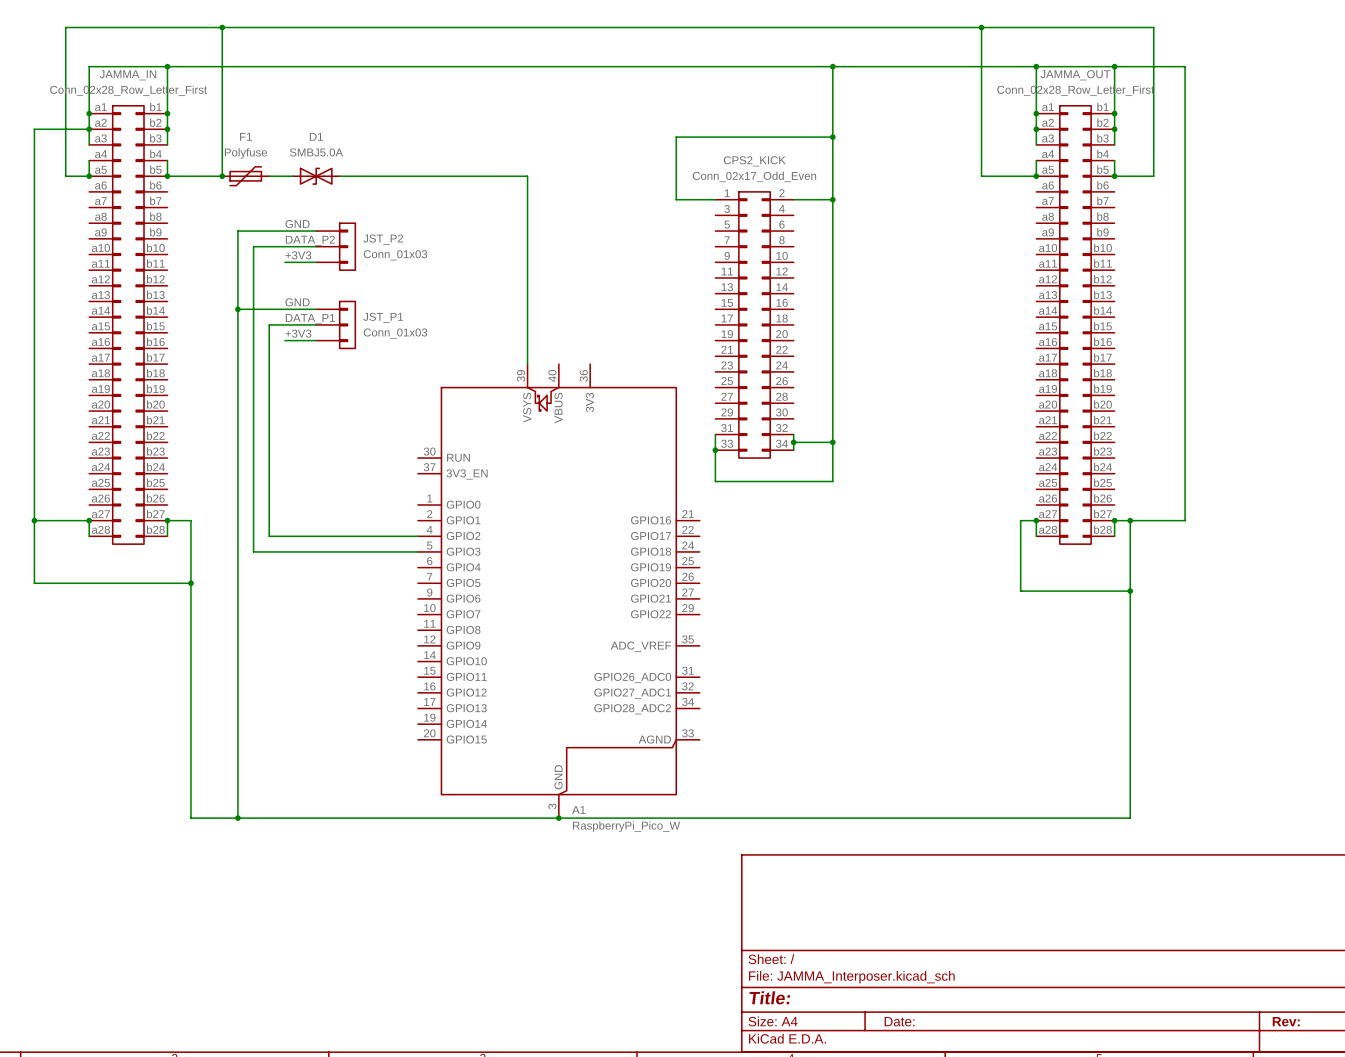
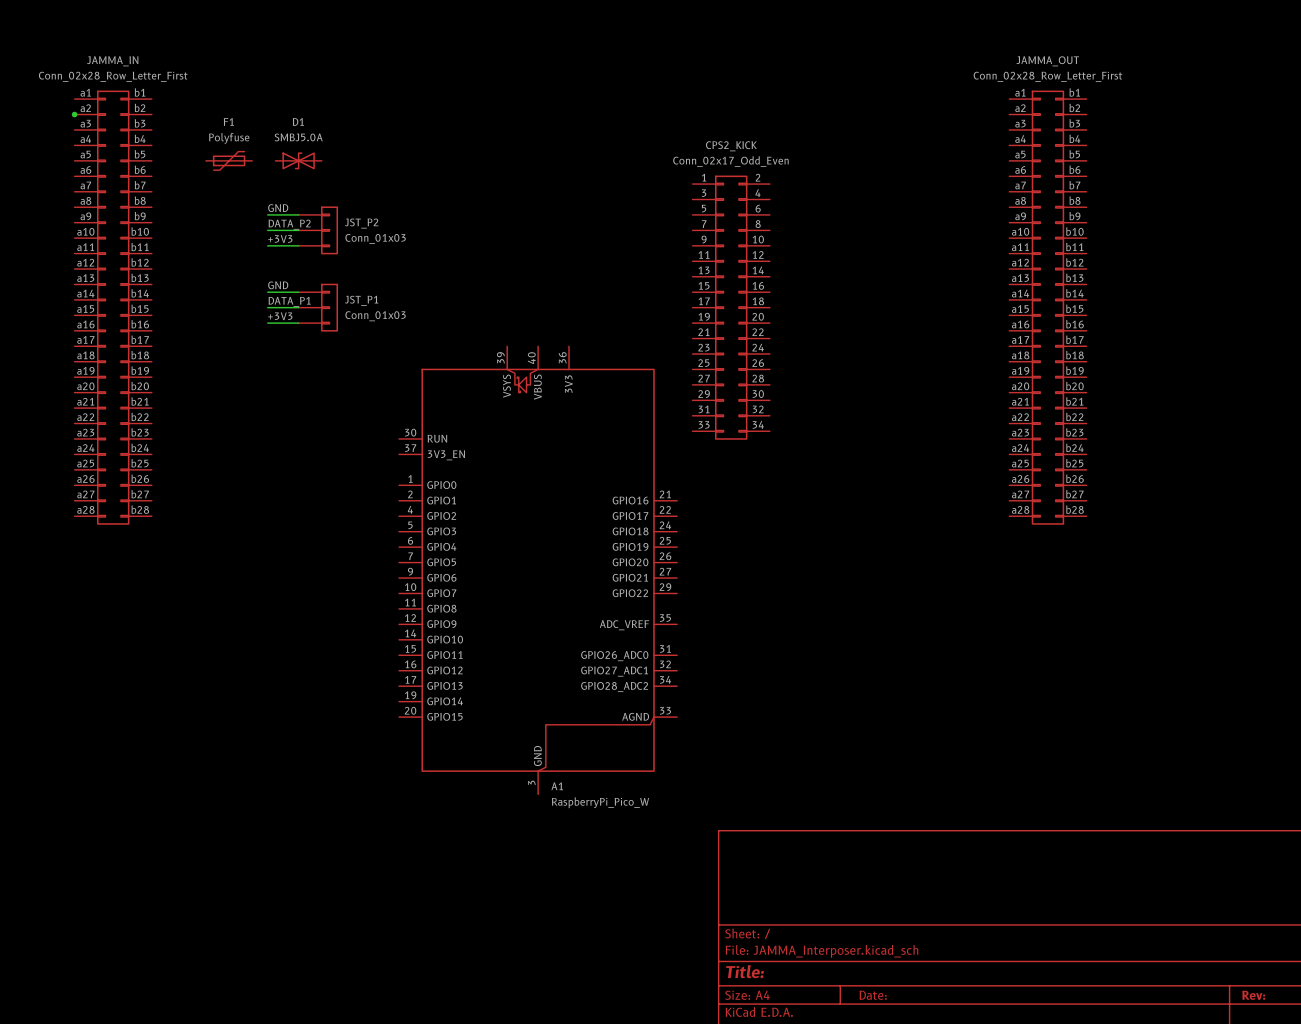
wire: (222, 27) (222, 176) (167, 176) (167, 160) -> none
junction: (222, 27) -> none
wire: (981, 27) (981, 176) (1036, 176) (1036, 160) -> none
junction: (981, 27) -> none
wire: (167, 66) (167, 144) -> none
junction: (167, 66) -> none
wire: (832, 66) (832, 481) (715, 481) (715, 434) -> none
junction: (832, 66) -> none
wire: (1036, 66) (1036, 144) -> none
junction: (1036, 66) -> none
wire: (1114, 66) (1114, 144) -> none
junction: (1114, 66) -> none
junction: (89, 113) -> none
junction: (167, 113) -> none
junction: (1036, 113) -> none
junction: (1114, 113) -> none
wire: (89, 129) (34, 129) (34, 583) (190, 583) -> none
junction: (167, 129) -> none
junction: (1036, 129) -> none
junction: (1114, 129) -> none
wire: (832, 137) (676, 137) (676, 199) (715, 199) -> none
junction: (832, 137) -> none
wire: (89, 144) (89, 66) (1185, 66) (1185, 520) (1114, 520) (1114, 536) -> none
wire: (89, 160) (89, 176) (65, 176) (65, 27) (1153, 27) (1153, 176) (1114, 176) (1114, 160) -> none
junction: (89, 176) -> none
junction: (167, 176) -> none
junction: (222, 176) -> none
wire: (269, 176) (292, 176) -> none
wire: (339, 176) (527, 176) (527, 364) -> none
junction: (1036, 176) -> none
junction: (1114, 176) -> none
wire: (793, 199) (832, 199) -> none
junction: (832, 199) -> none
wire: (284, 231) (237, 231) (237, 818) -> none
wire: (284, 246) (253, 246) (253, 551) (417, 551) -> none
wire: (237, 309) (284, 309) -> none
junction: (237, 309) -> none
wire: (284, 324) (269, 324) (269, 536) (417, 536) -> none
wire: (793, 434) (793, 450) -> none
wire: (793, 442) (832, 442) -> none
junction: (793, 442) -> none
junction: (832, 442) -> none
junction: (715, 450) -> none
wire: (34, 520) (89, 520) (89, 536) -> none
junction: (34, 520) -> none
junction: (89, 520) -> none
junction: (167, 520) -> none
junction: (1036, 520) -> none
junction: (1114, 520) -> none
wire: (1130, 520) (1130, 818) (190, 818) (190, 520) (167, 520) (167, 536) -> none
junction: (1130, 520) -> none
wire: (1036, 536) (1036, 520) (1020, 520) (1020, 591) (1130, 591) -> none
junction: (190, 583) -> none
junction: (1130, 591) -> none
junction: (237, 818) -> none
junction: (558, 818) -> none

